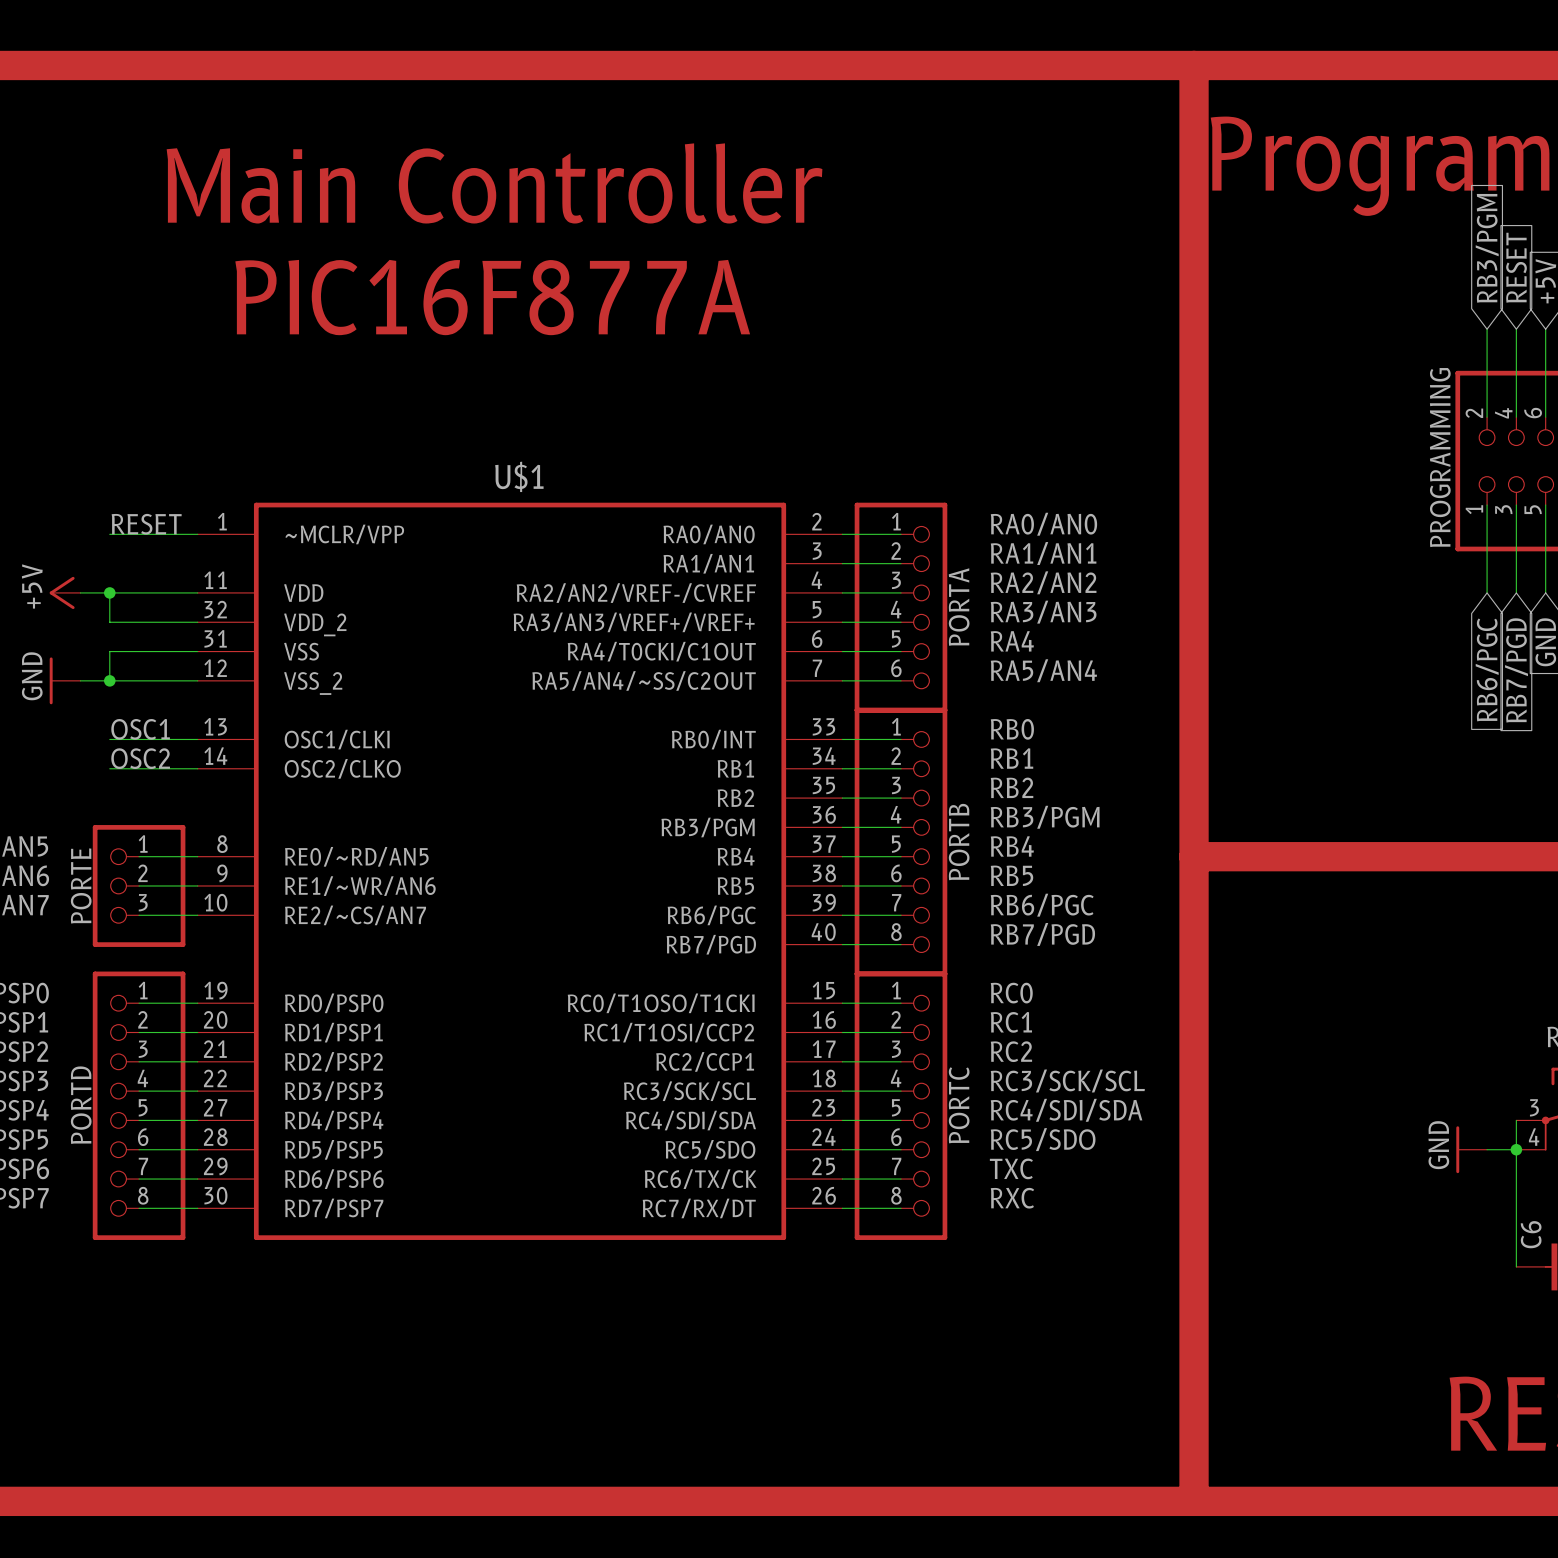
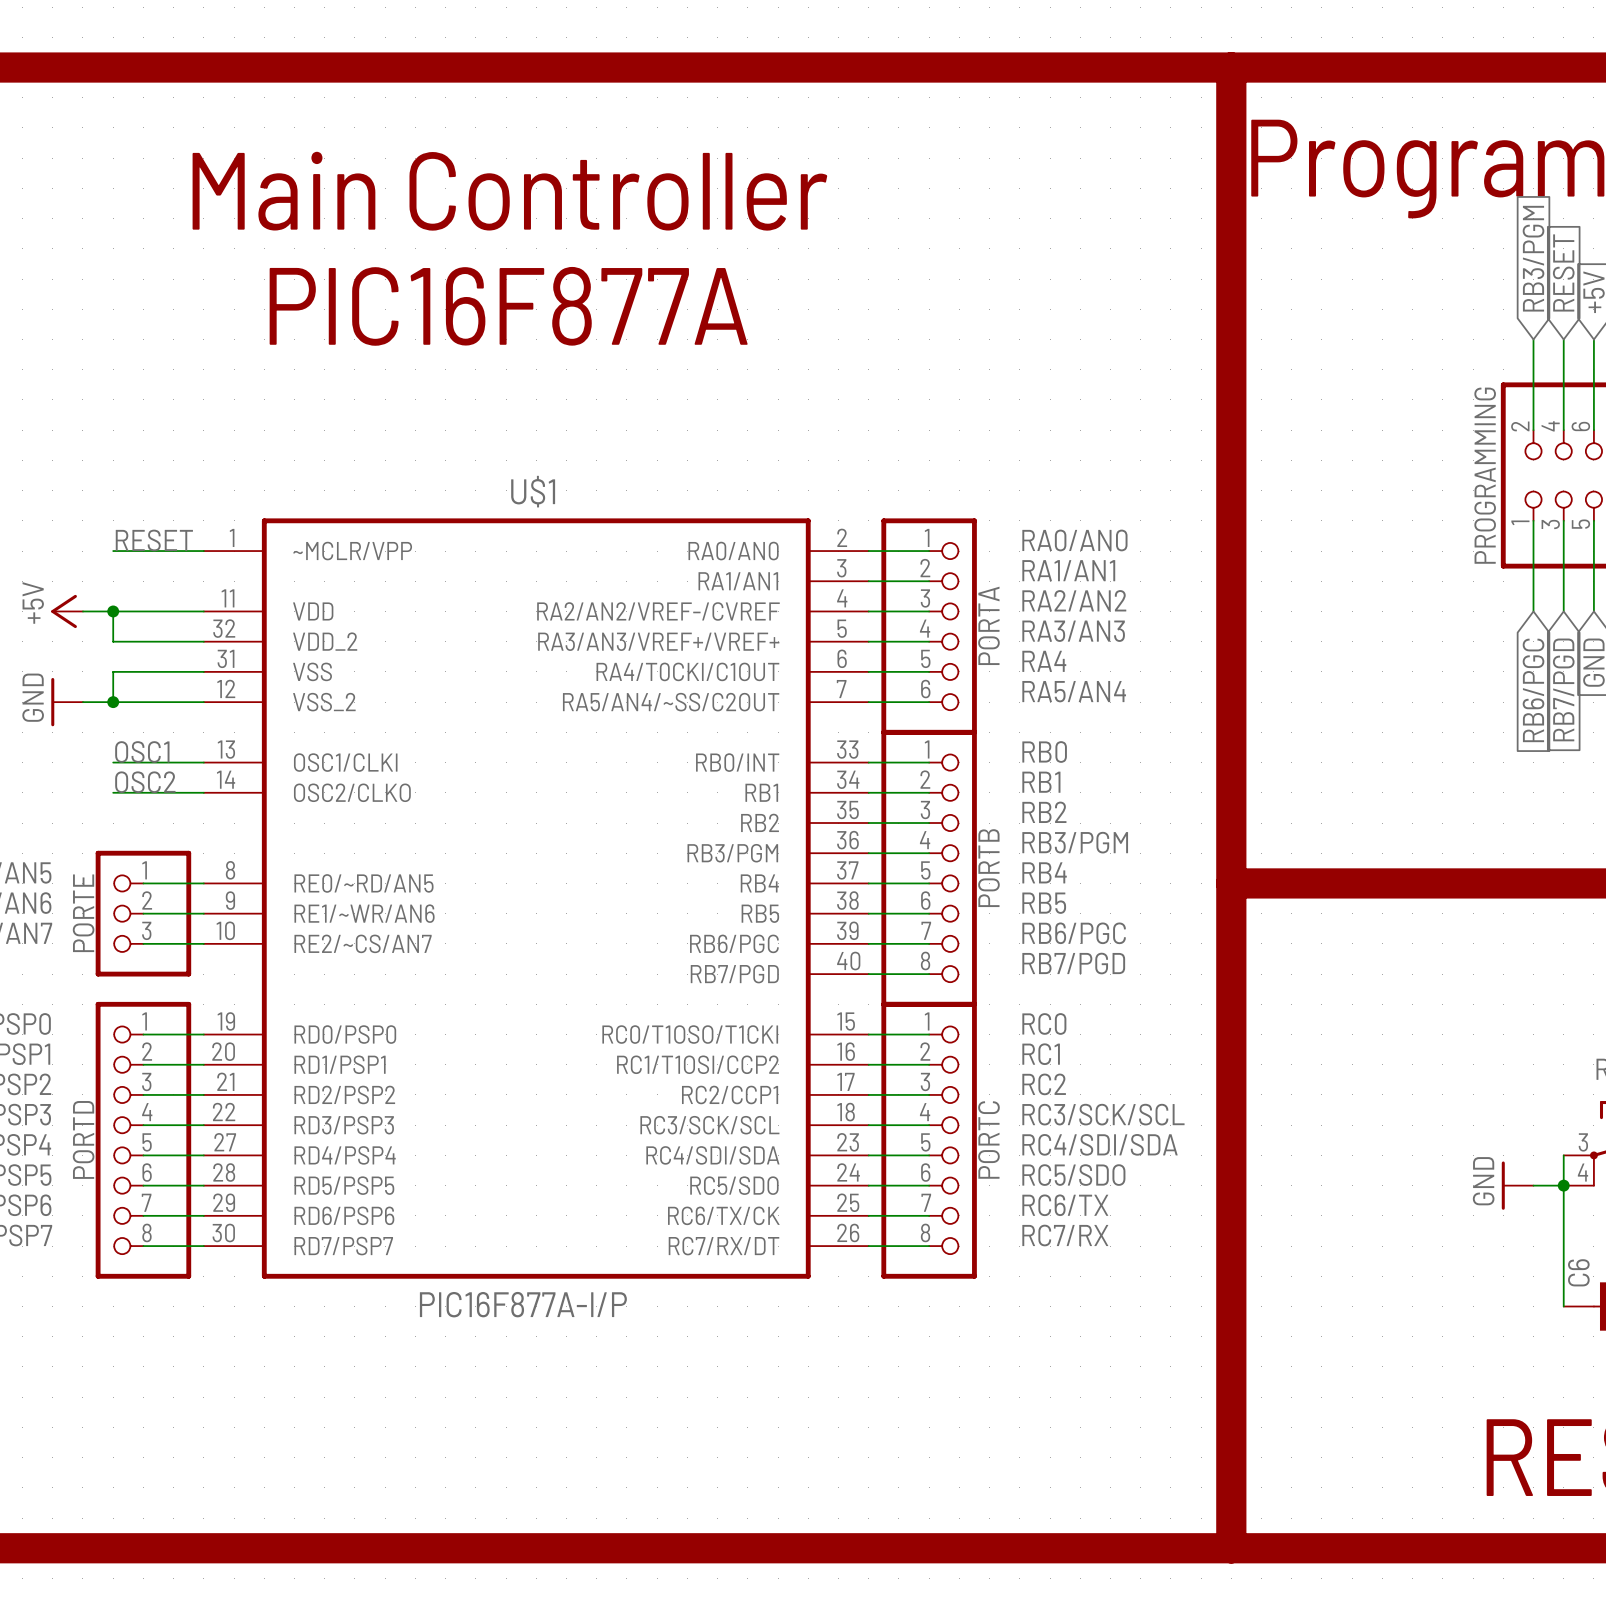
label: TXC (1011, 1168) -> RC6/TX (1065, 1205)
label: RXC (1012, 1198) -> RC7/RX (1065, 1235)
U$1 value: none -> PIC16F877A-I/P (523, 1304)

